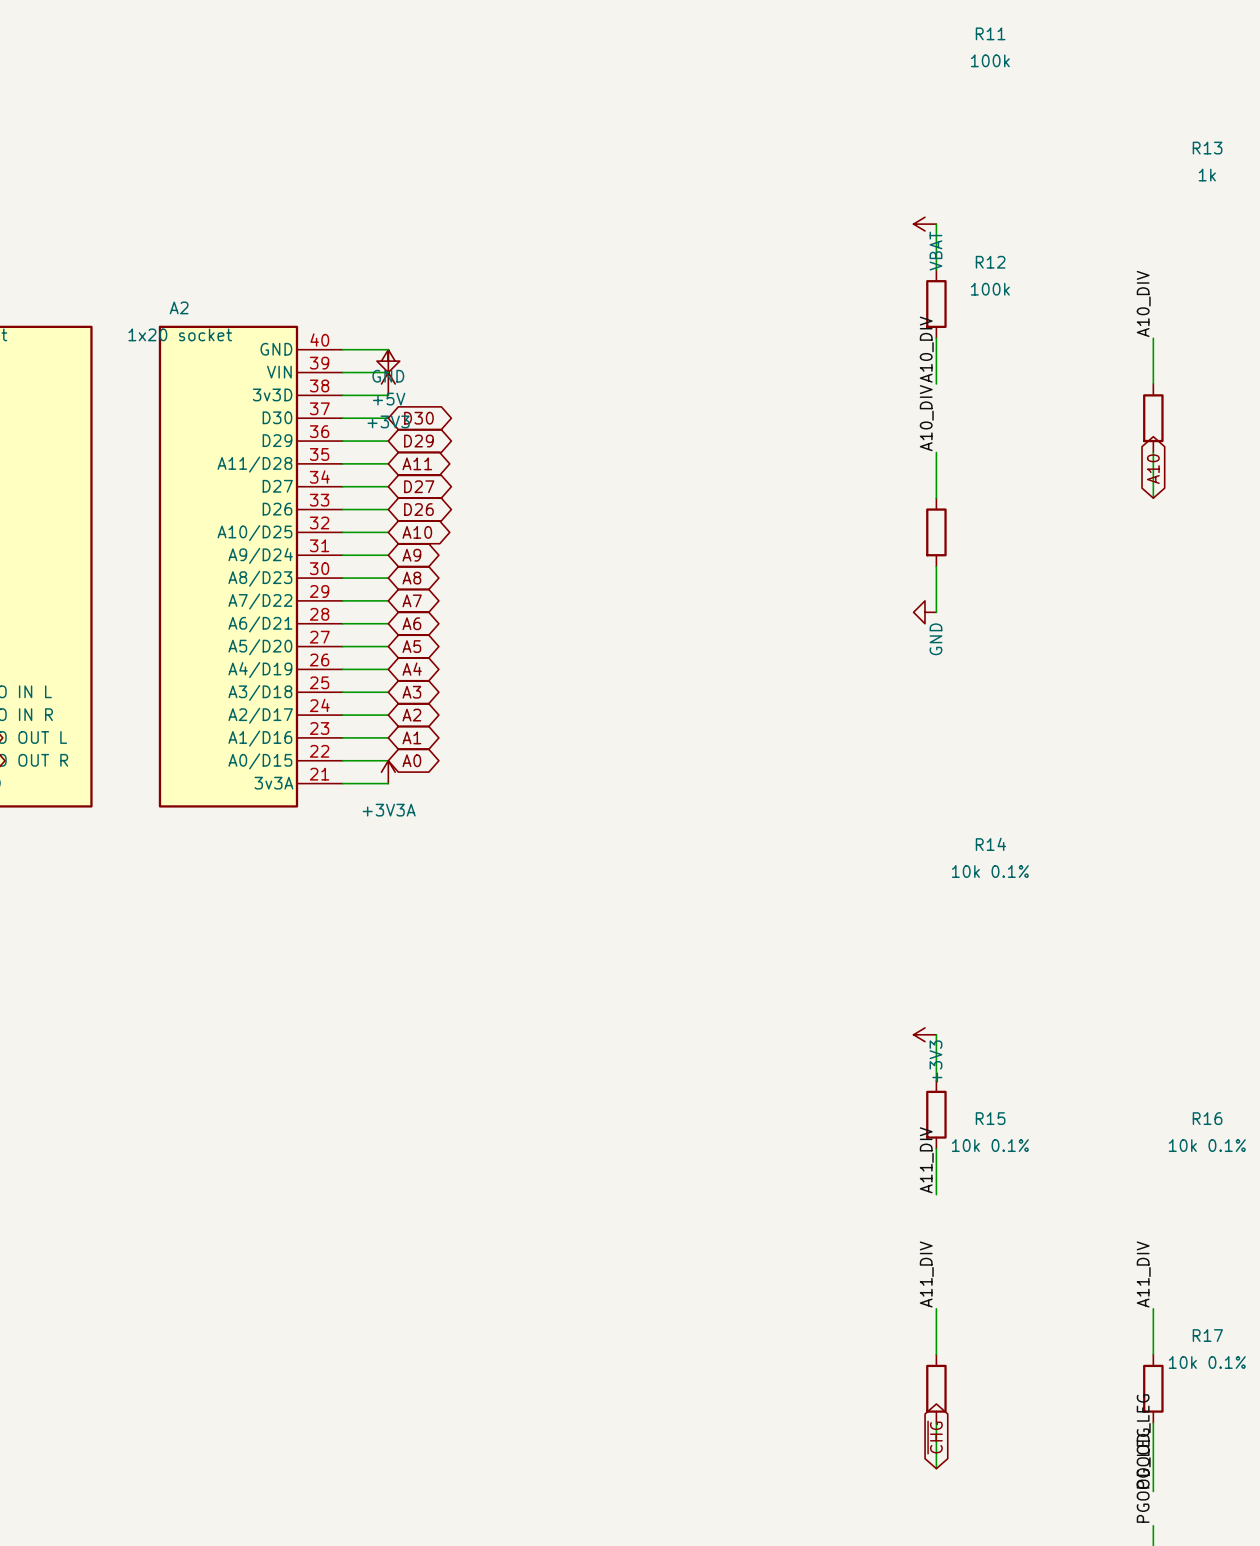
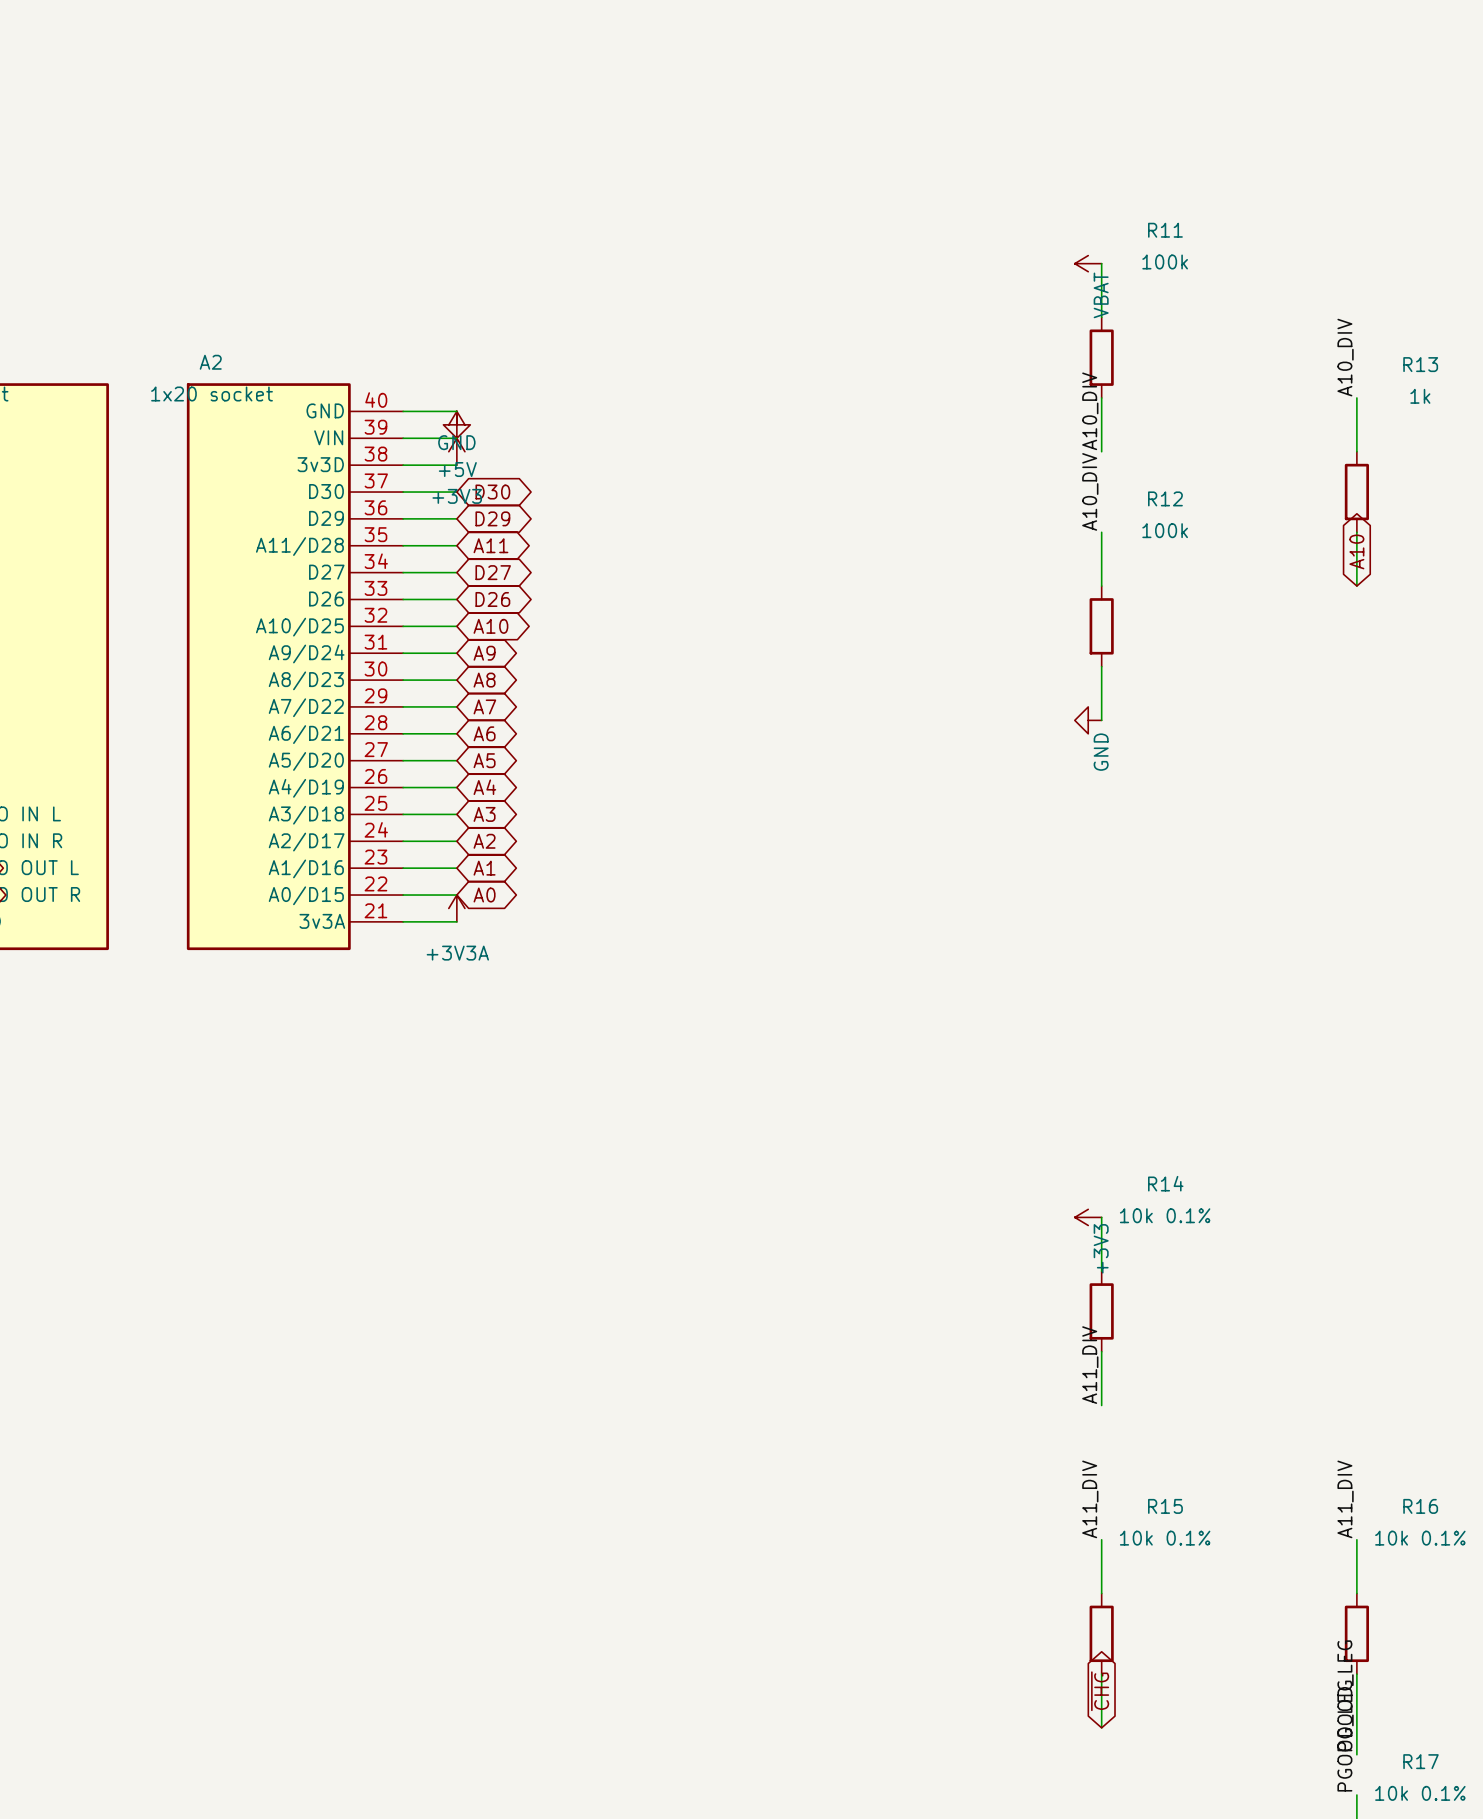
R11 name position: R11 (990, 33) -> R11 (1165, 230)
R11 value position: 100k (990, 60) -> 100k (1165, 261)
R13 name position: R13 (1207, 148) -> R13 (1420, 364)
R13 value position: 1k (1207, 175) -> 1k (1420, 396)
R12 name position: R12 (990, 262) -> R12 (1165, 498)
R12 value position: 100k (990, 289) -> 100k (1165, 530)
R14 name position: R14 (990, 844) -> R14 (1165, 1183)
R14 value position: 10k 0.1% (990, 871) -> 10k 0.1% (1165, 1215)
R15 name position: R15 (990, 1118) -> R15 (1165, 1506)
R16 name position: R16 (1207, 1118) -> R16 (1420, 1506)
R15 value position: 10k 0.1% (990, 1145) -> 10k 0.1% (1165, 1538)
R16 value position: 10k 0.1% (1207, 1145) -> 10k 0.1% (1420, 1538)
R17 name position: R17 (1207, 1335) -> R17 (1421, 1761)
R17 value position: 10k 0.1% (1207, 1362) -> 10k 0.1% (1420, 1793)

